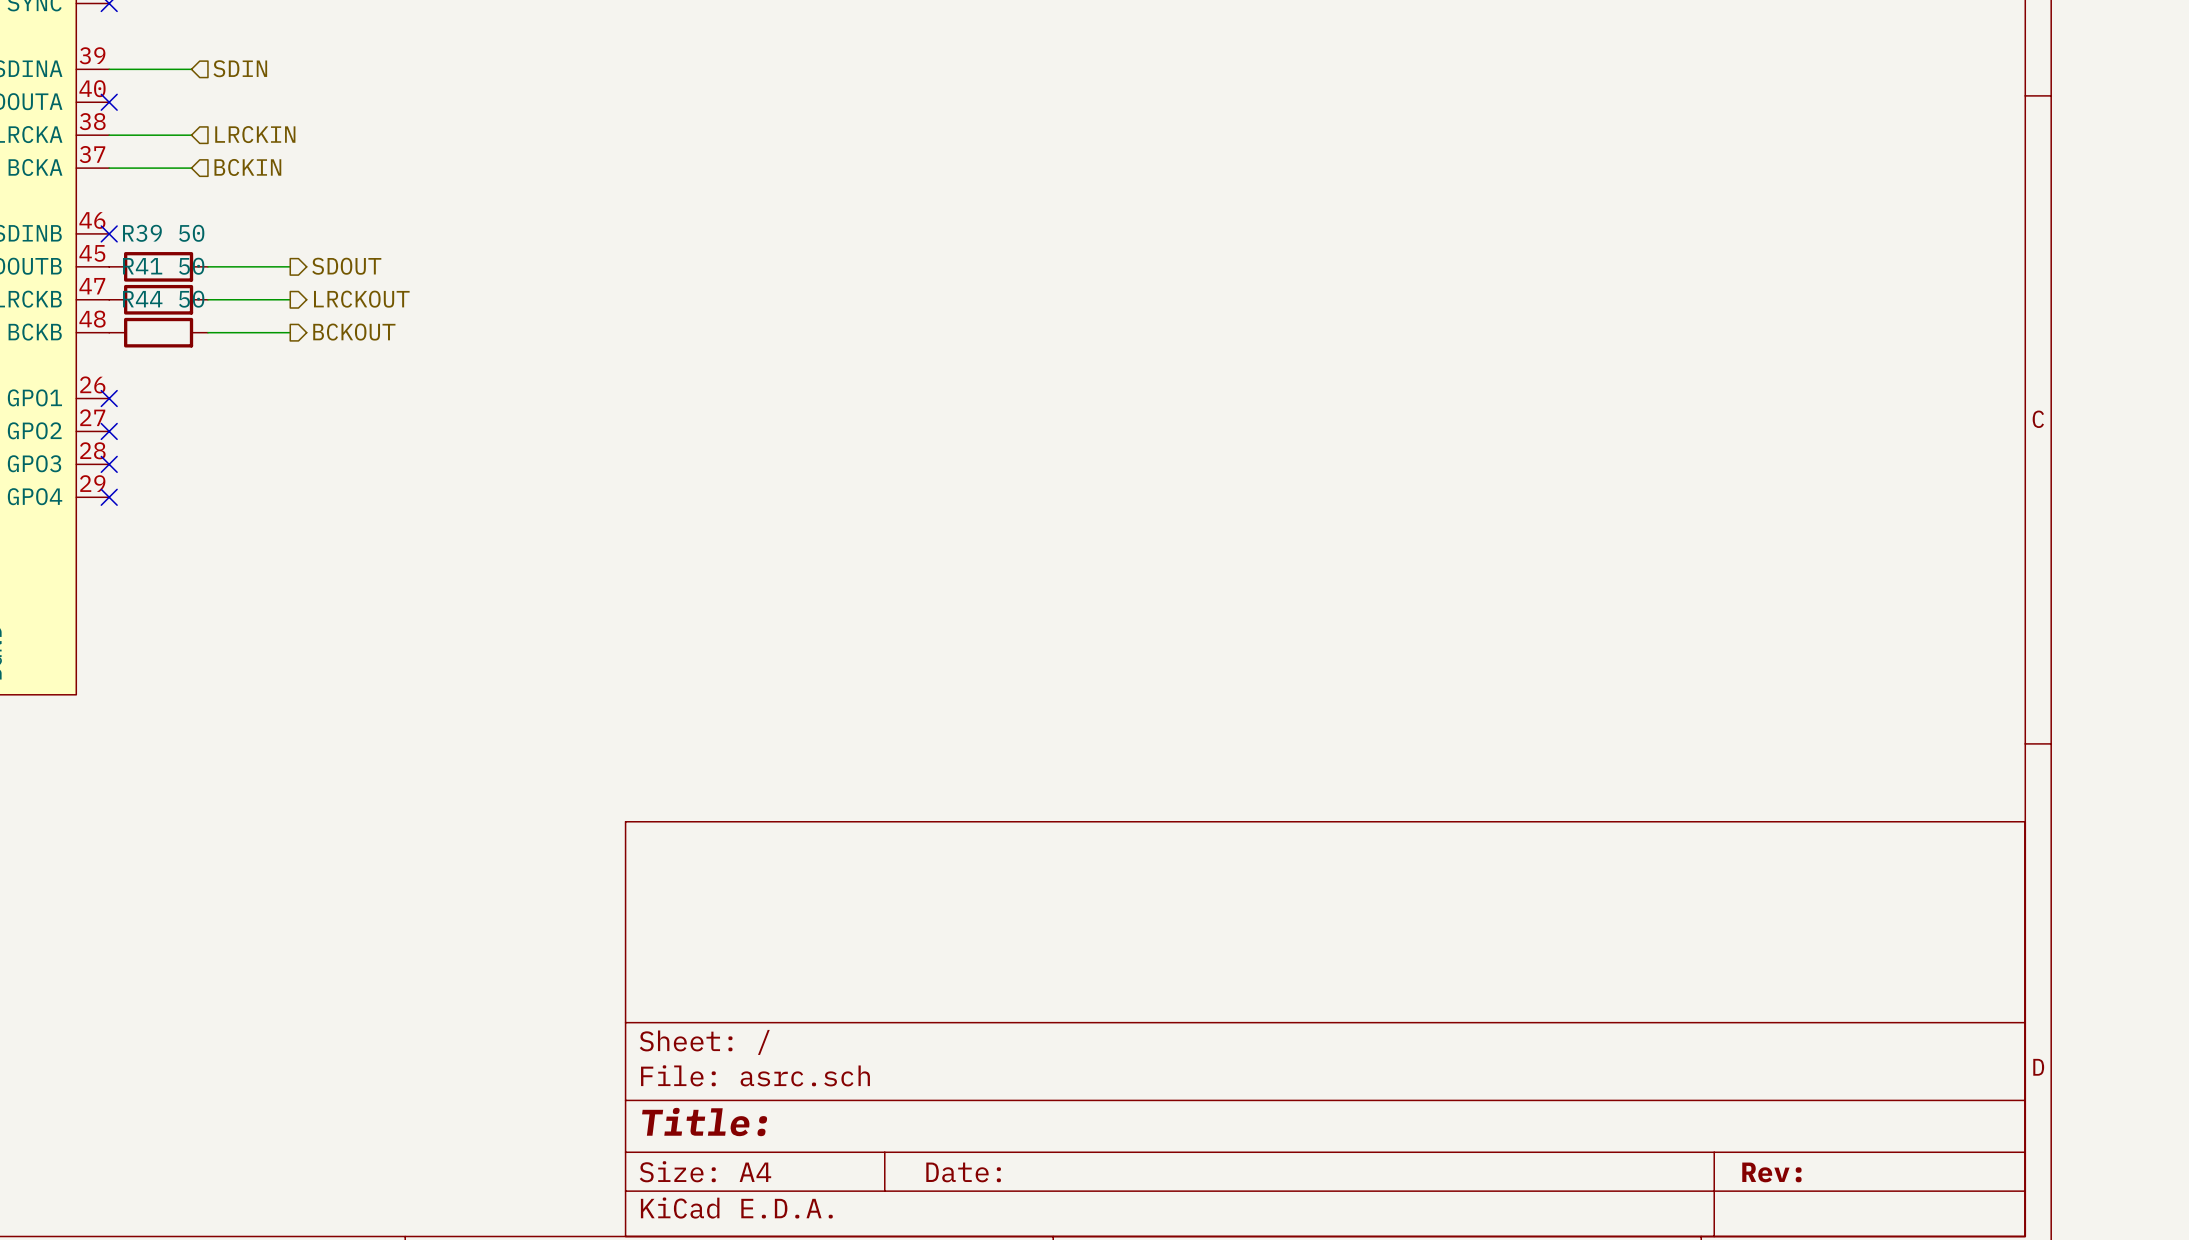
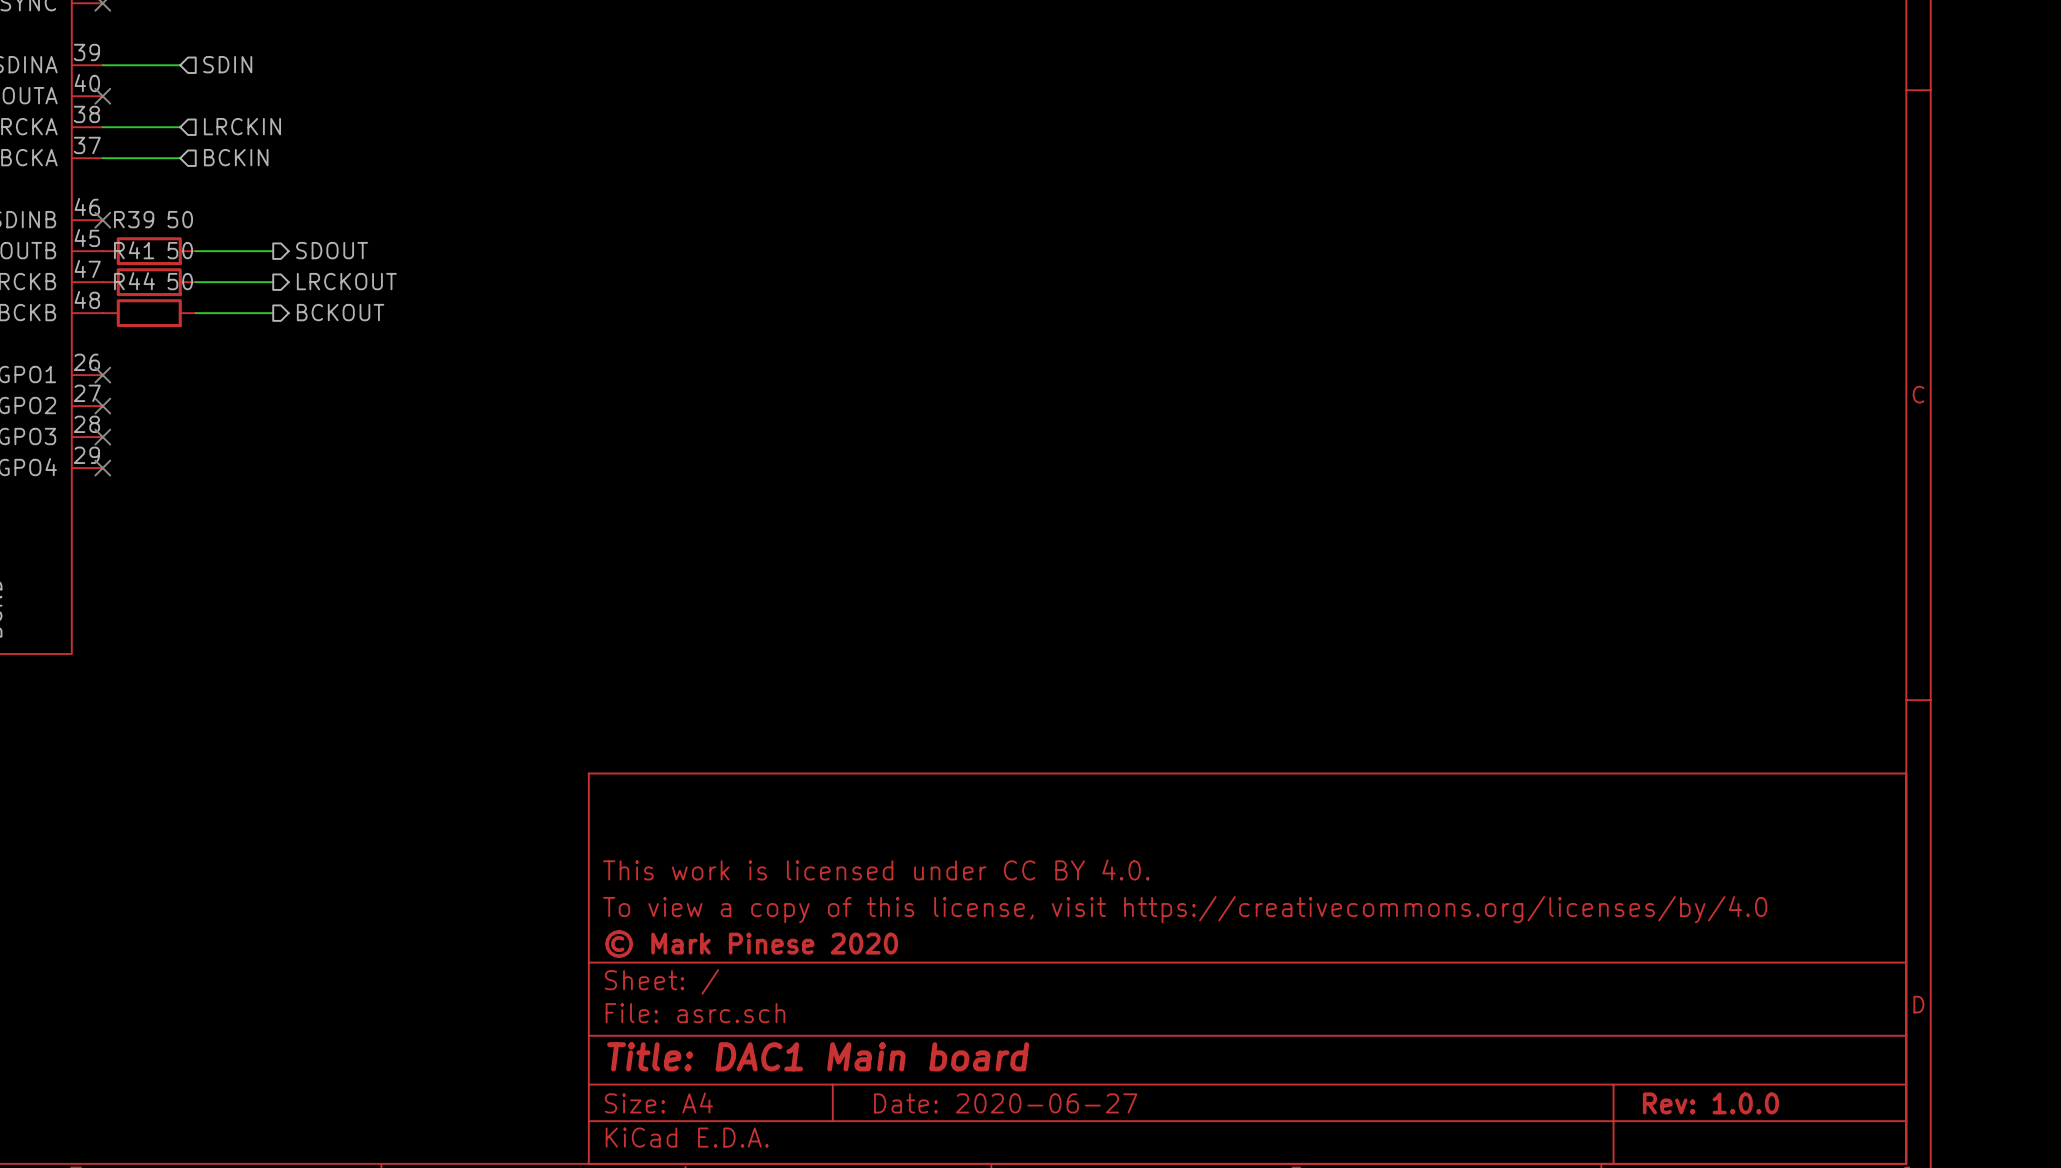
title block: none -> This work is licensed under CC BY 4.0. (876, 869)
title block: none -> To view a copy of this license, visit https://creativecommons.org/licenses/by/4.0 (1185, 909)
title block: none -> © Mark Pinese 2020 (751, 944)
title block: Title: (704, 1122) -> Title: DAC1 Main board (818, 1056)
title block: Date: (963, 1172) -> Date: 2020-06-27 (1005, 1103)
title block: Rev: (1771, 1172) -> Rev: 1.0.0 (1710, 1103)

